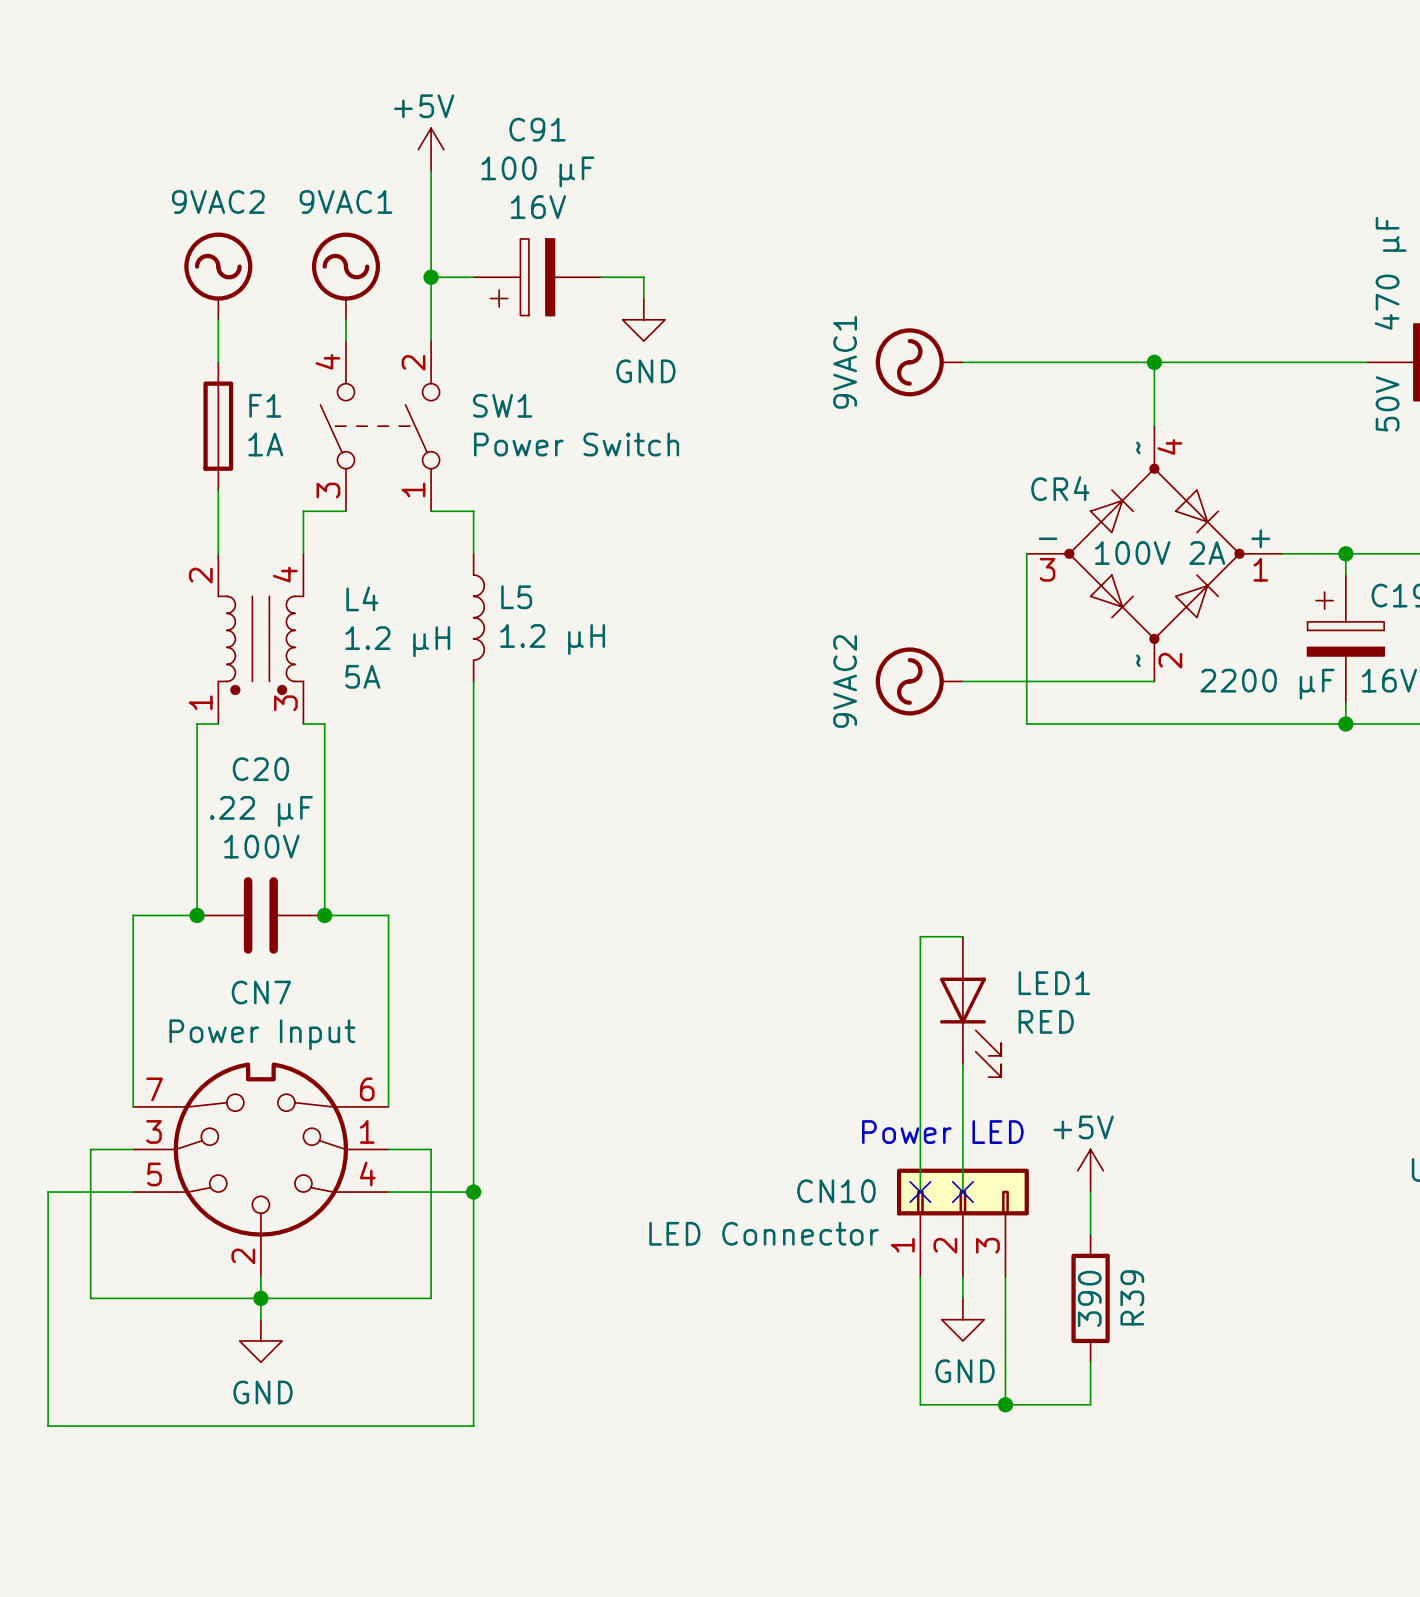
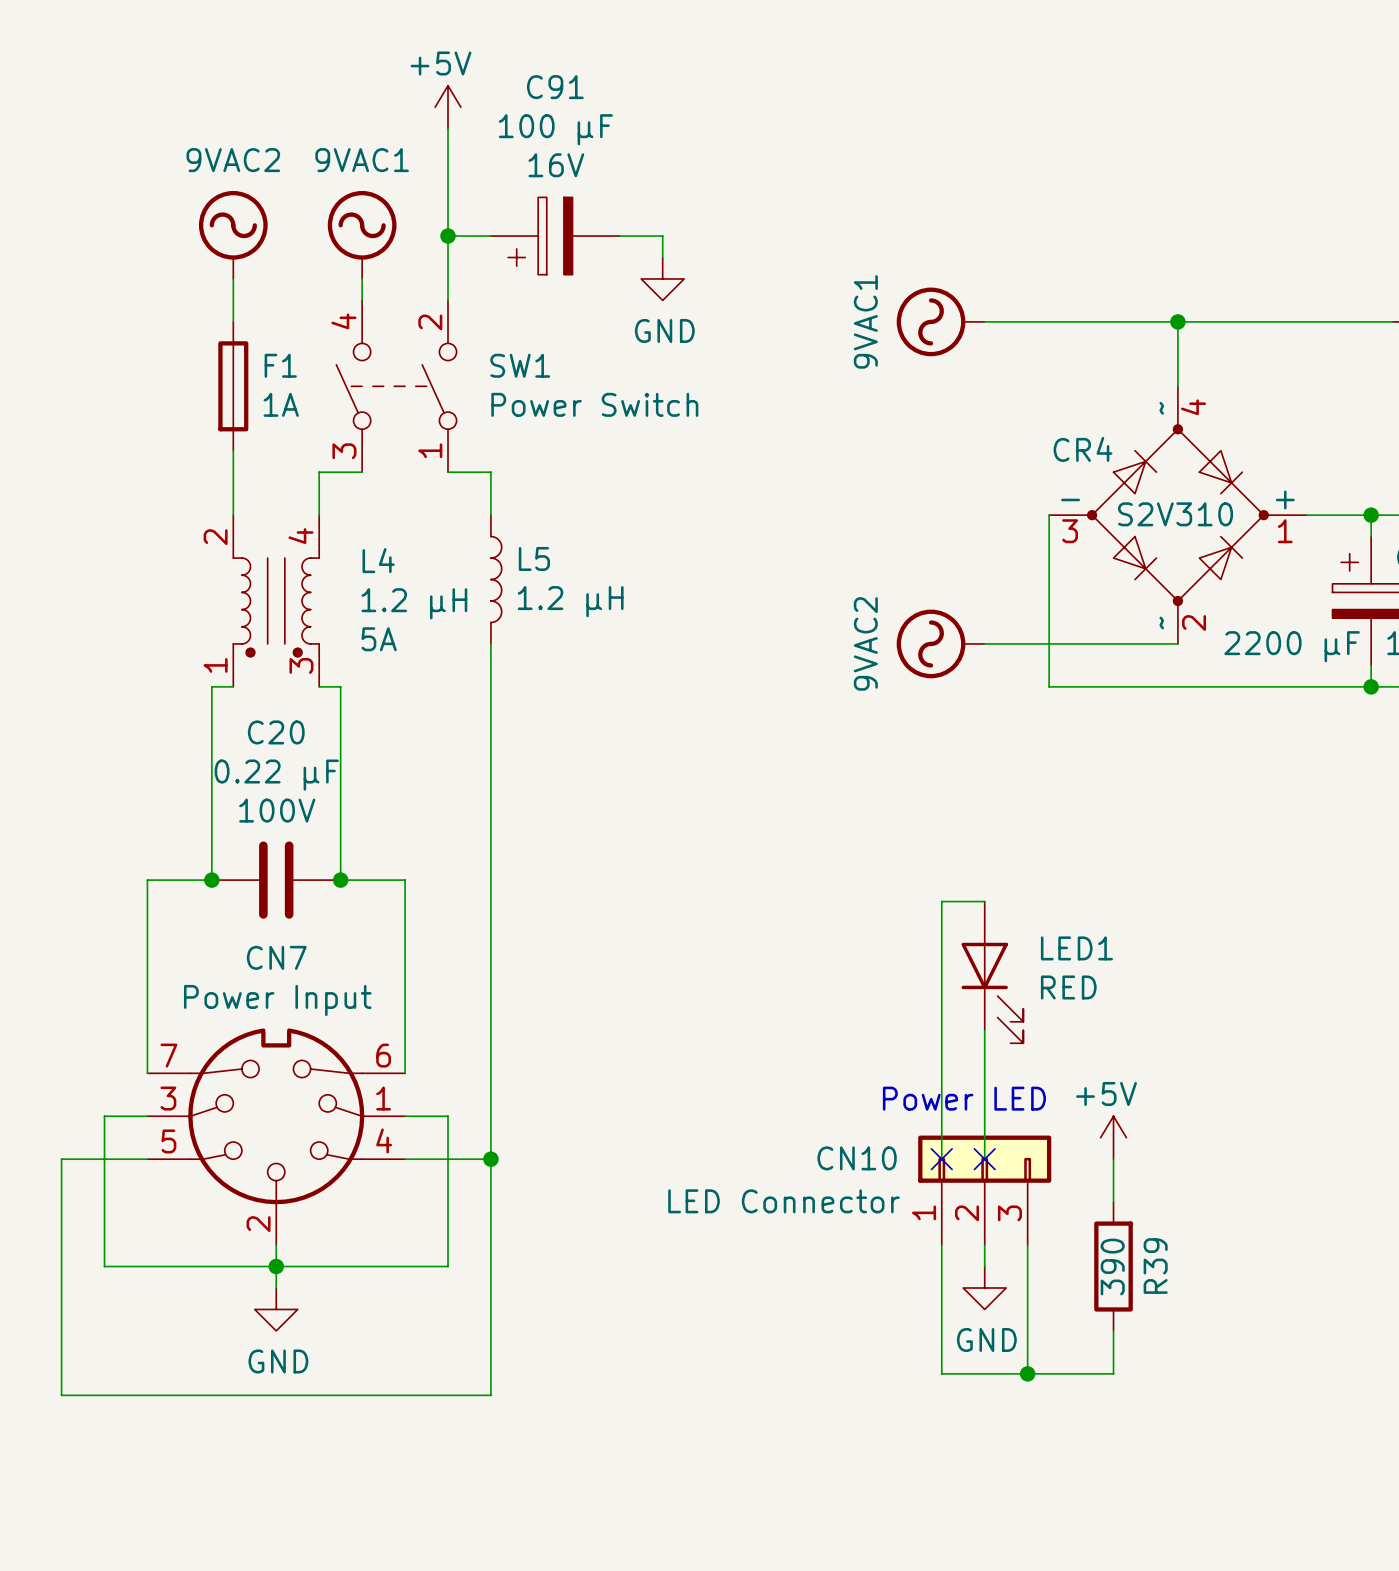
CR4 value: 100V 2A (1160, 553) -> S2V310 (1175, 514)
C20 value: .22 μF (261, 811) -> 0.22 μF (276, 775)

